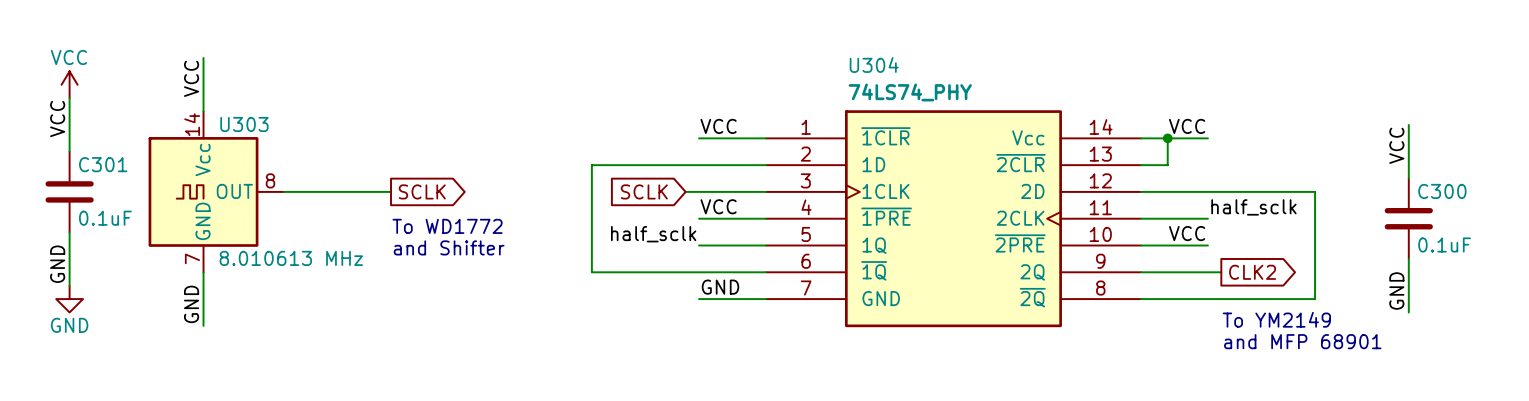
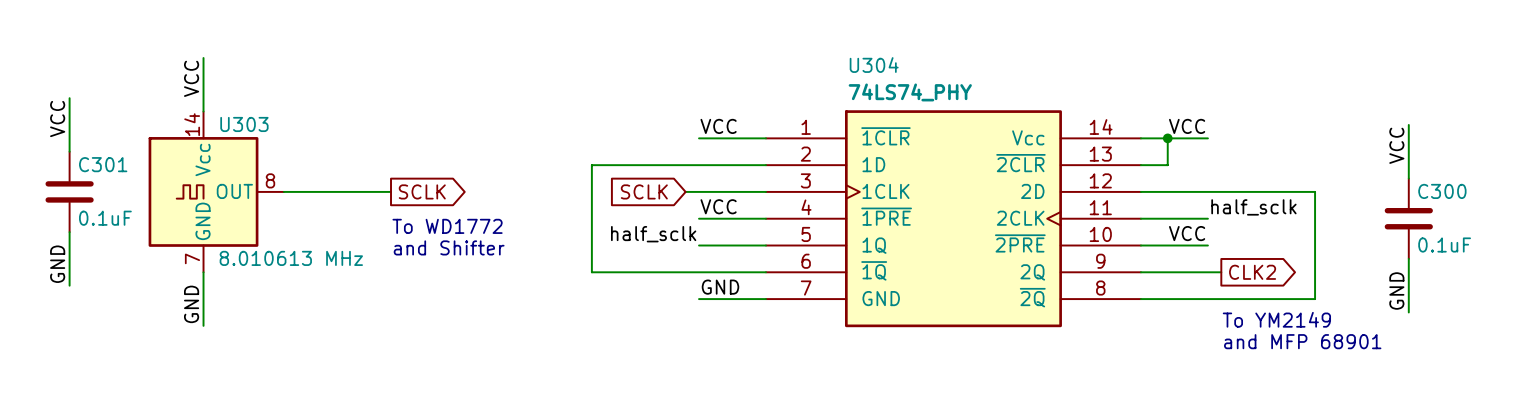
power symbol: VCC (69, 84) -> none
power symbol: GND (69, 299) -> none

